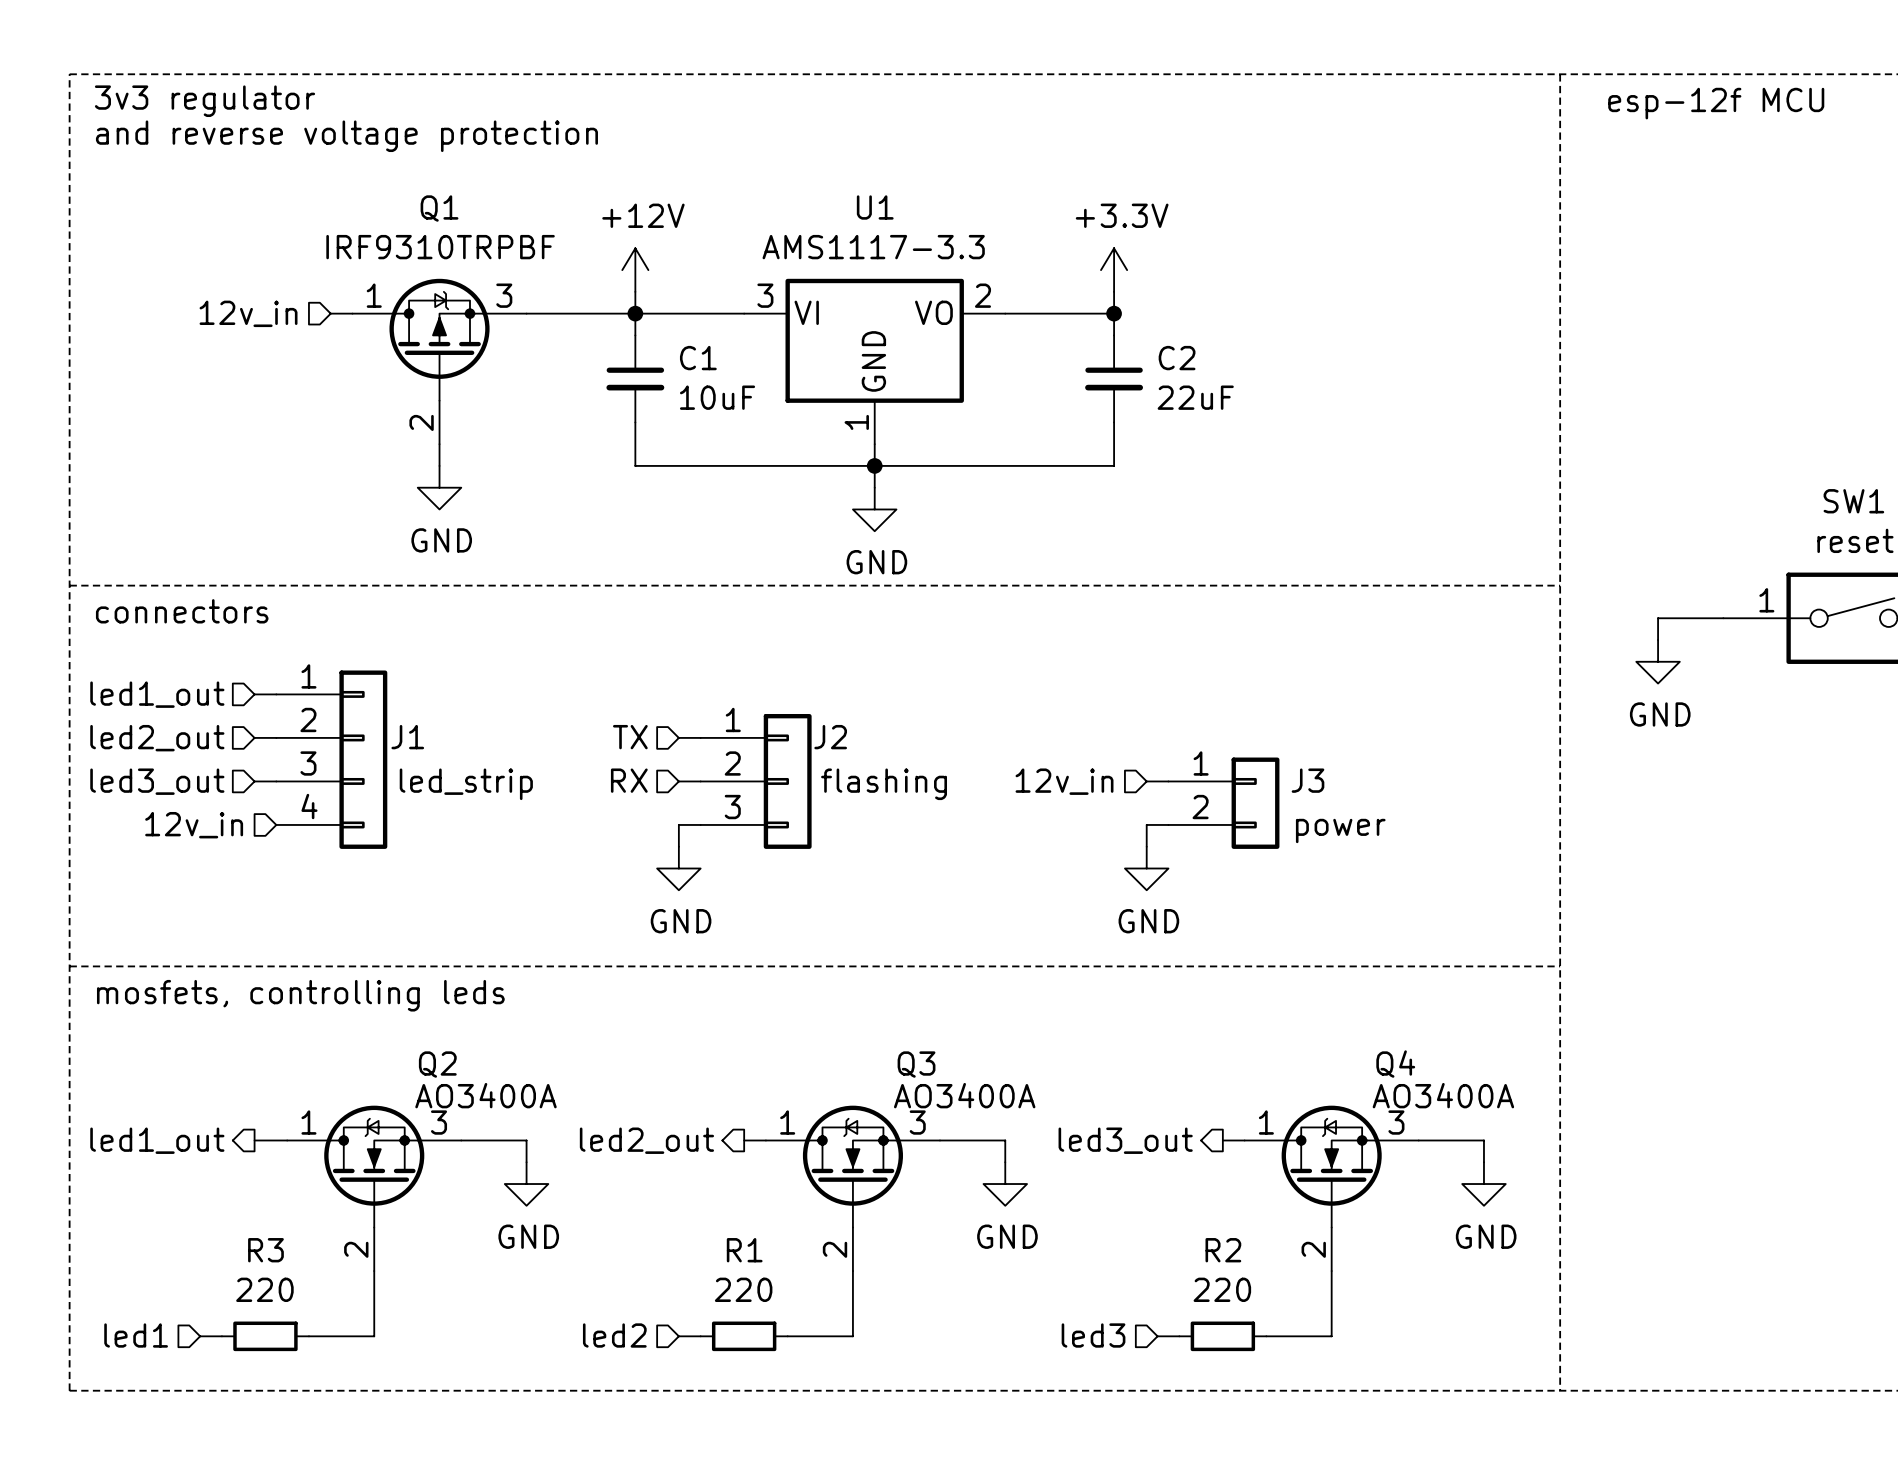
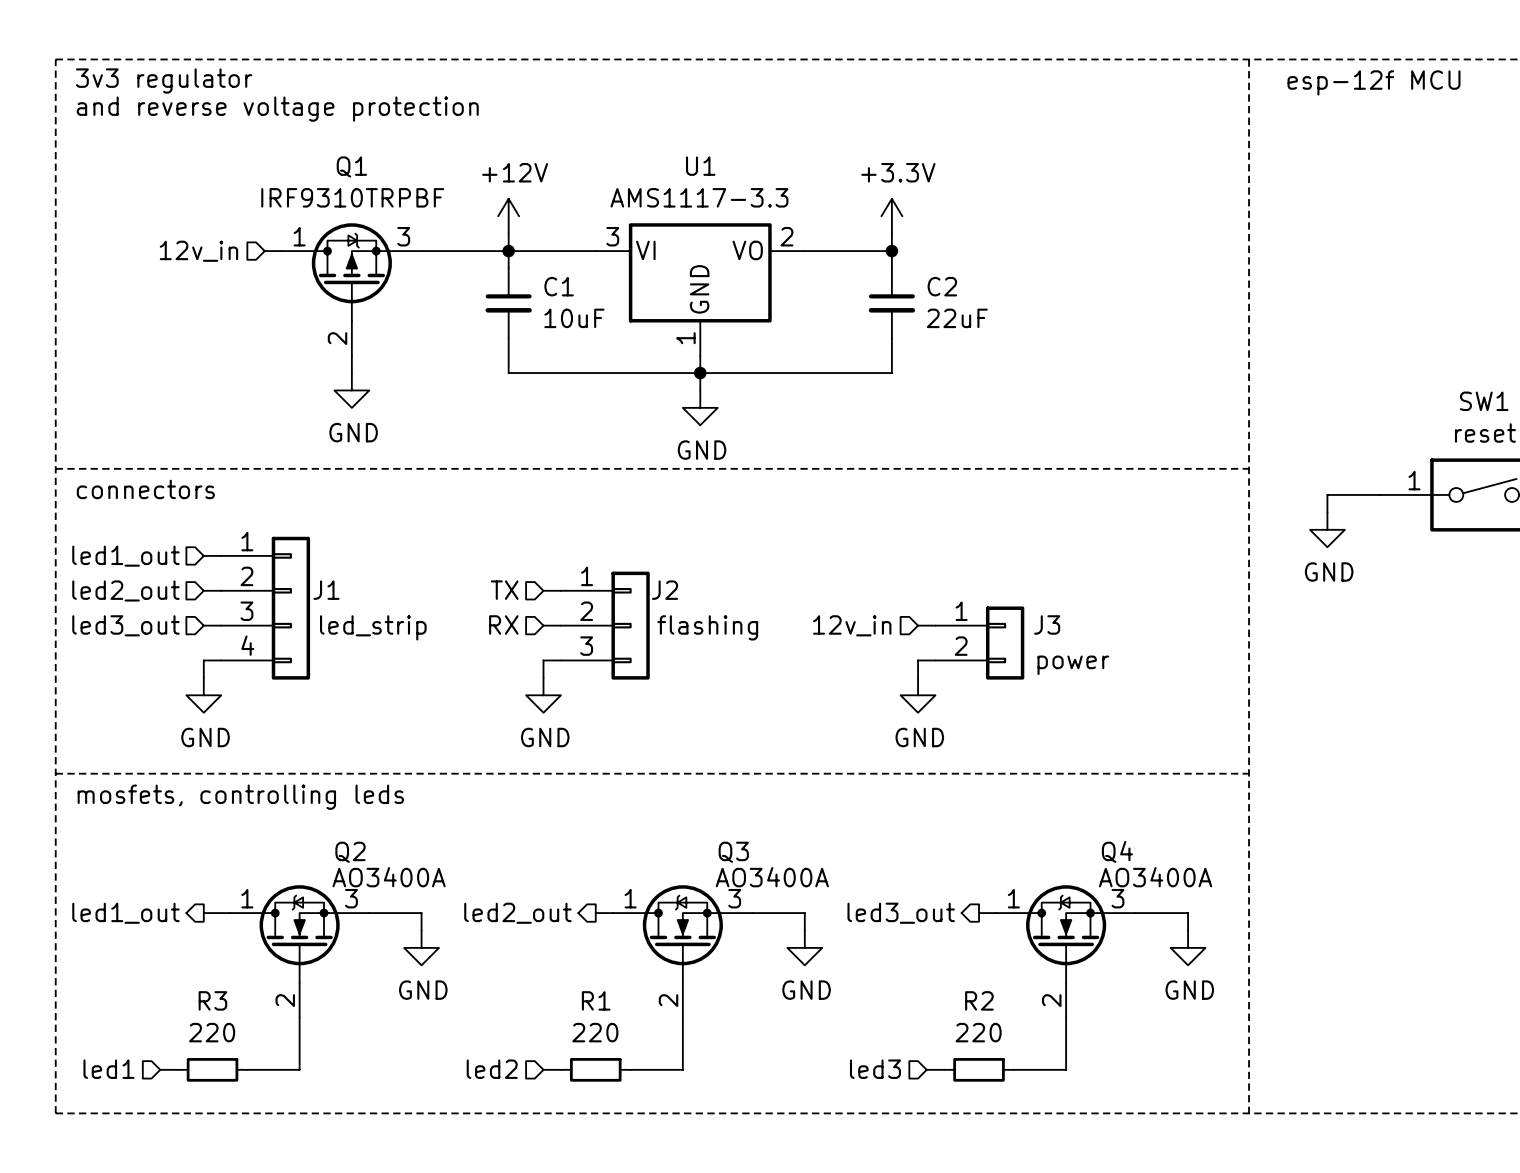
wire: none -> (221, 660) (203, 660) (203, 677)
hierarchical label: 12v_in (194, 825) -> none
power symbol: none -> GND (203, 695)

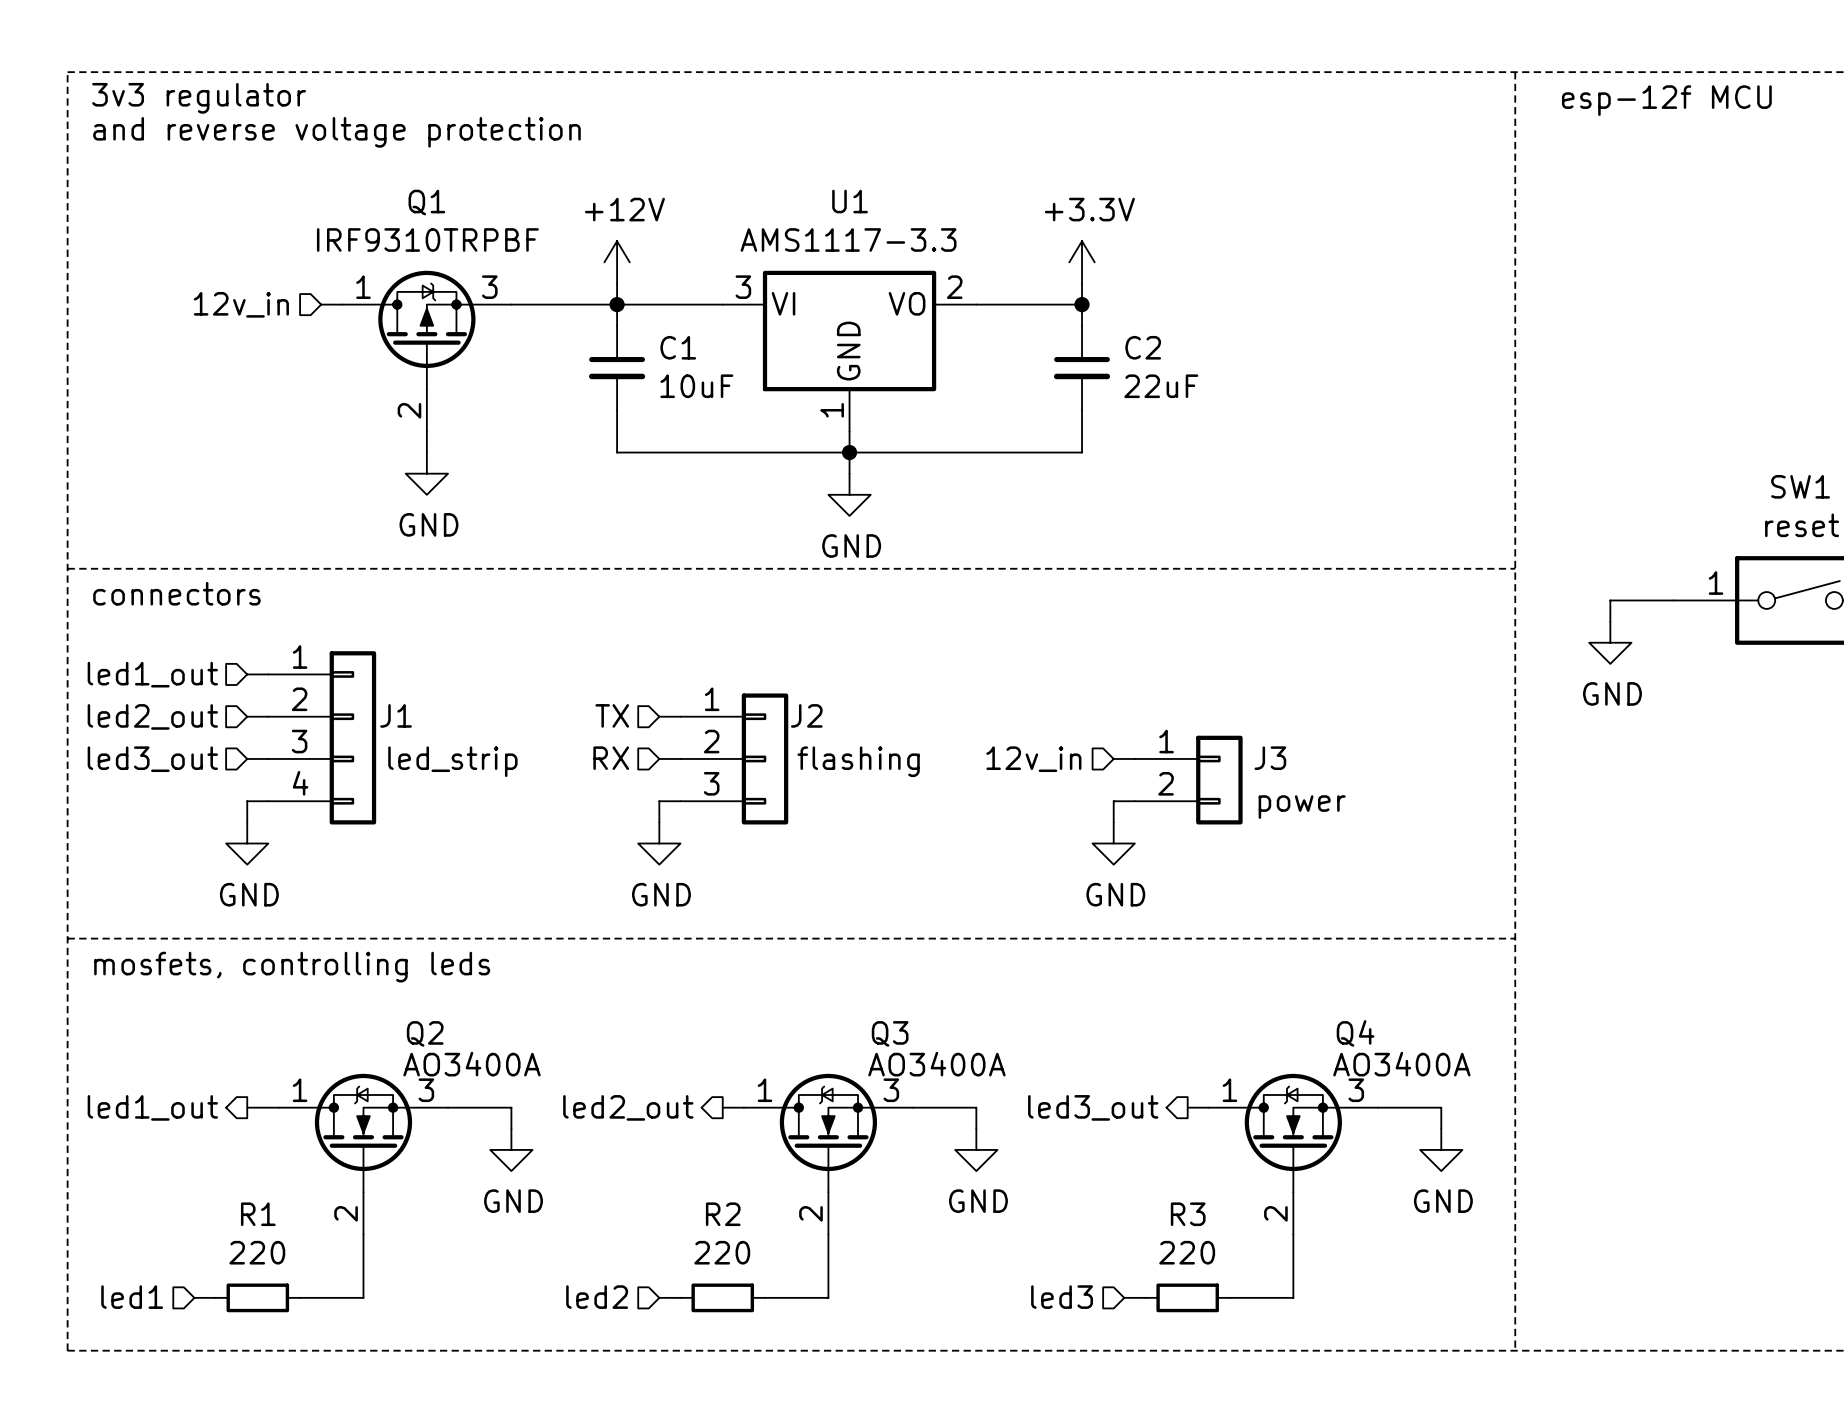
R3 name: R3 (212, 1000) -> R1 (258, 1214)
R1 name: R1 (596, 1000) -> R2 (723, 1214)
R2 name: R2 (979, 1000) -> R3 (1188, 1214)

